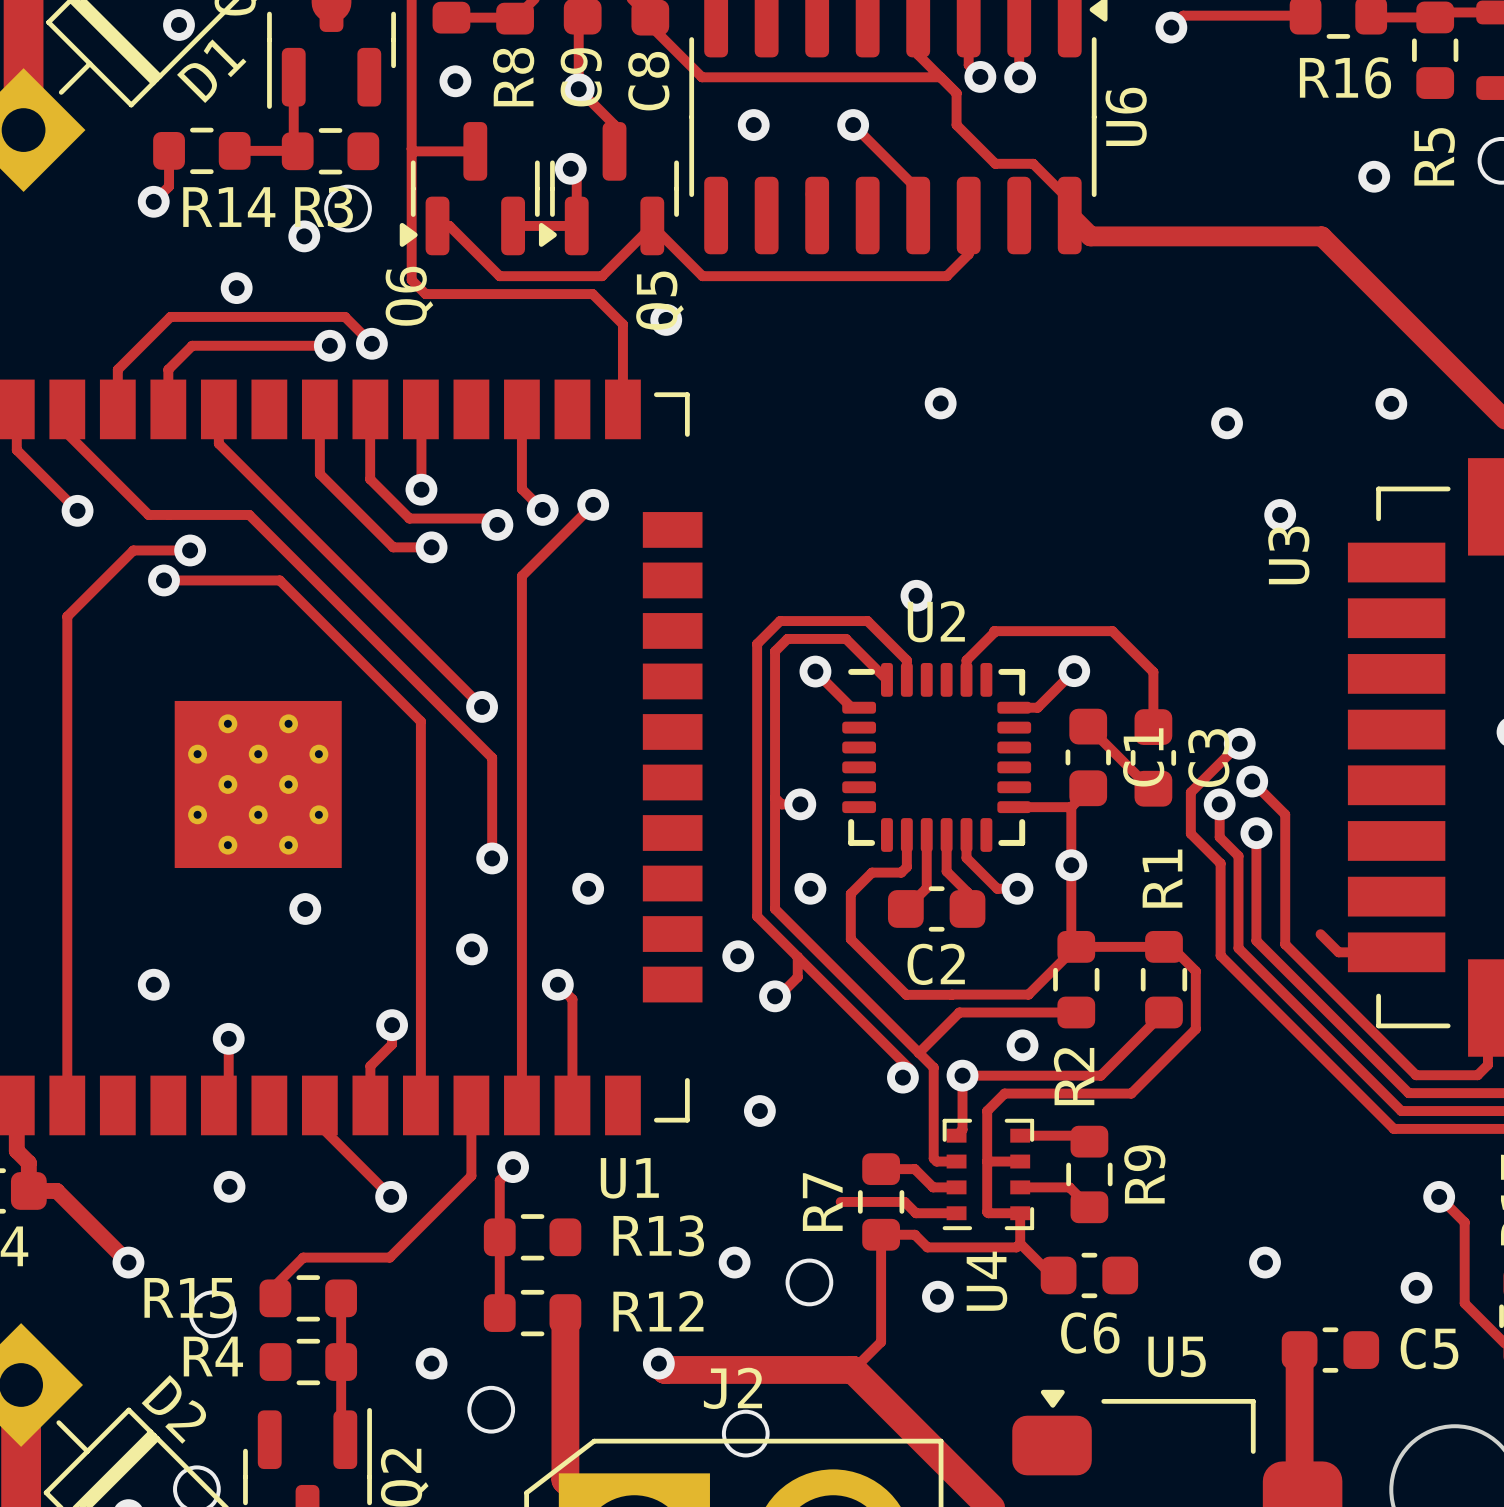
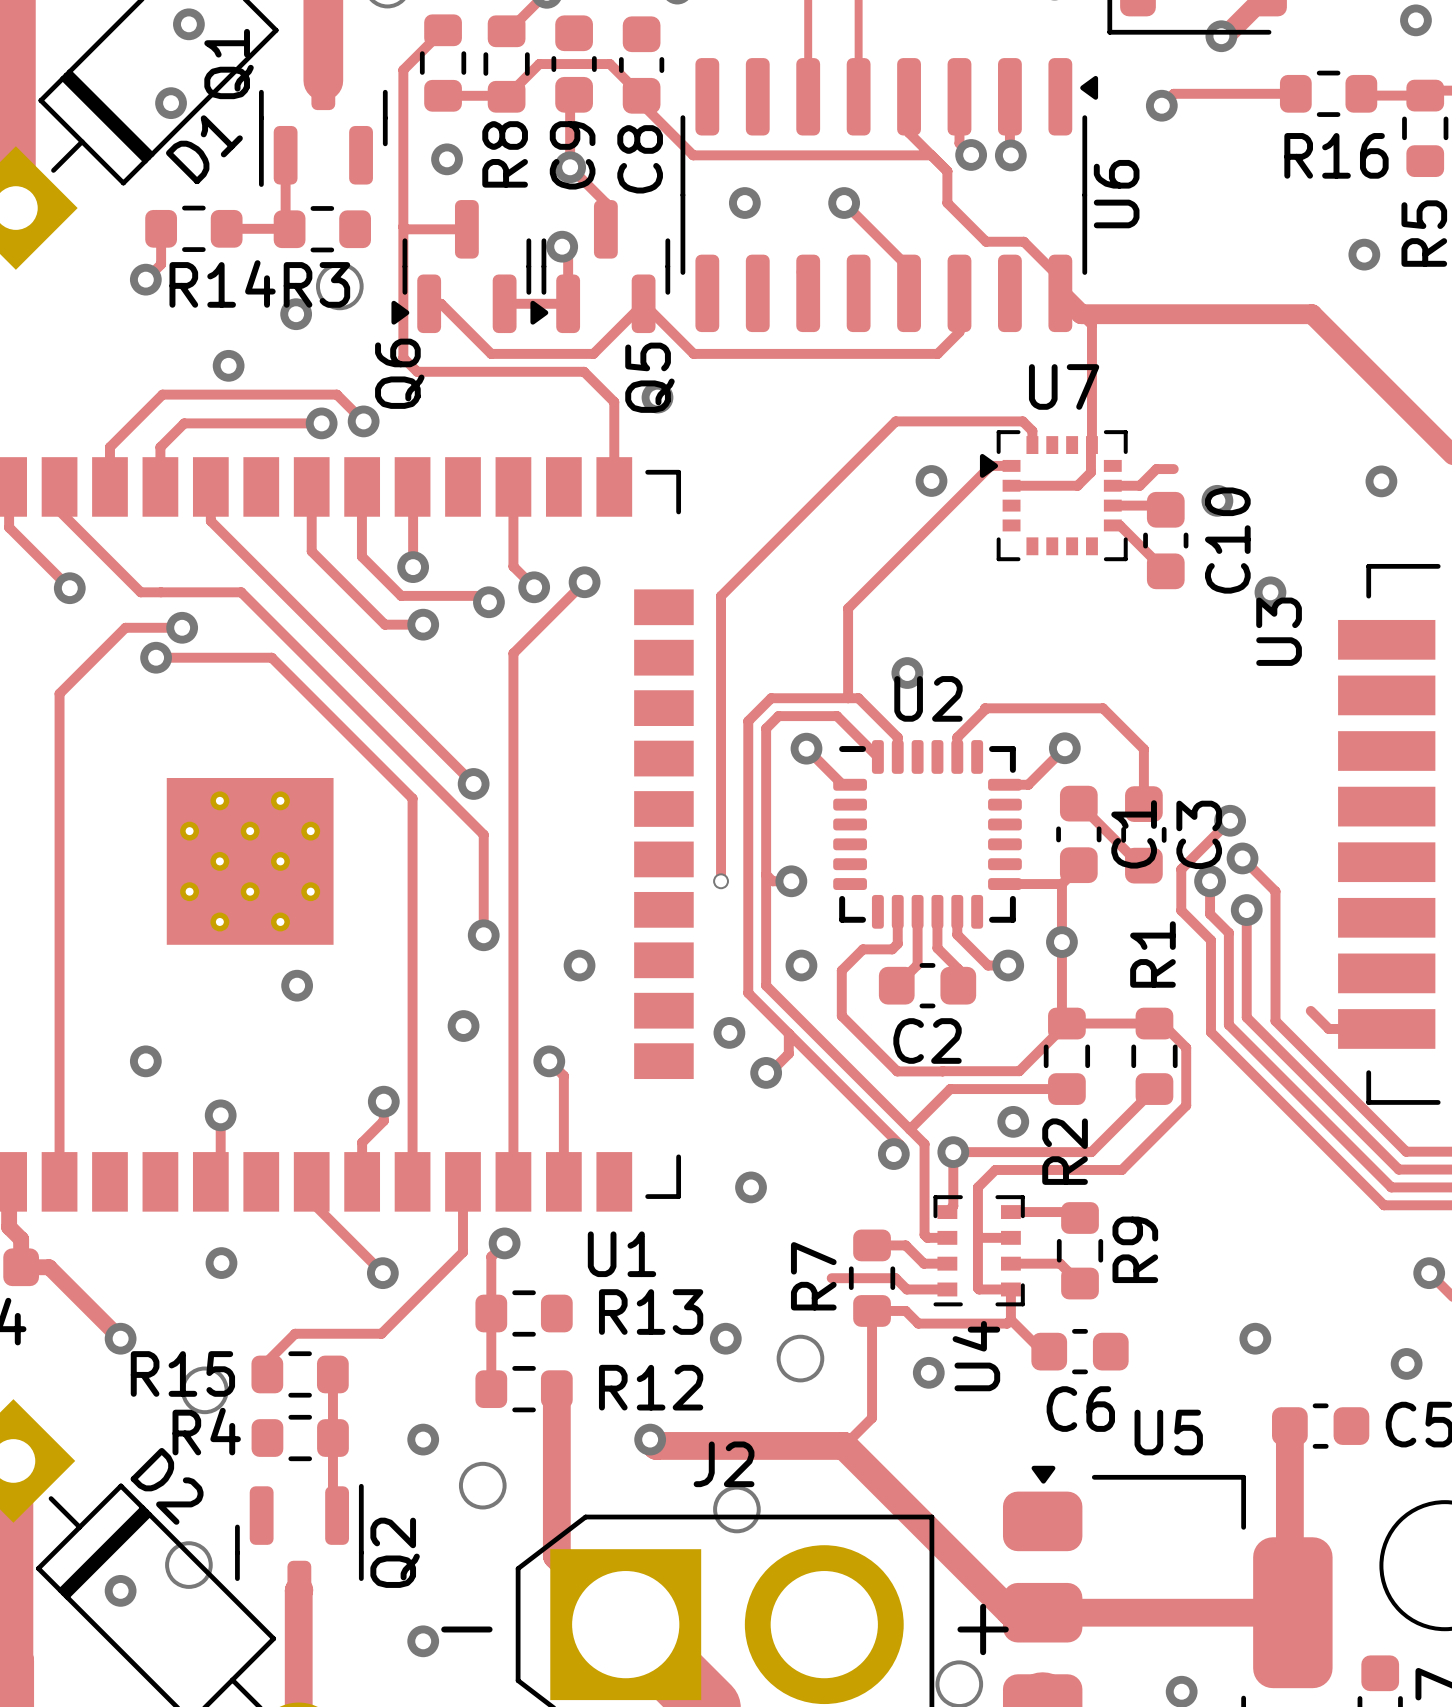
track: none -> (1060, 293) (1091, 324) (1090, 472) (1077, 485) (1011, 485)
track: none -> (1032, 445) (1032, 430) (1022, 421) (895, 421) (721, 596) (721, 881)
track: none -> (1011, 465) (990, 465) (848, 608) (848, 698)
track: none -> (1173, 469) (1156, 469) (1139, 485) (1112, 485)
U7: none -> (1053, 495)
track: none -> (1112, 505) (1161, 505) (1165, 509)
track: none -> (1112, 525) (1119, 525) (1165, 571)
C10: none -> (1165, 540)
via: none -> (721, 881)

